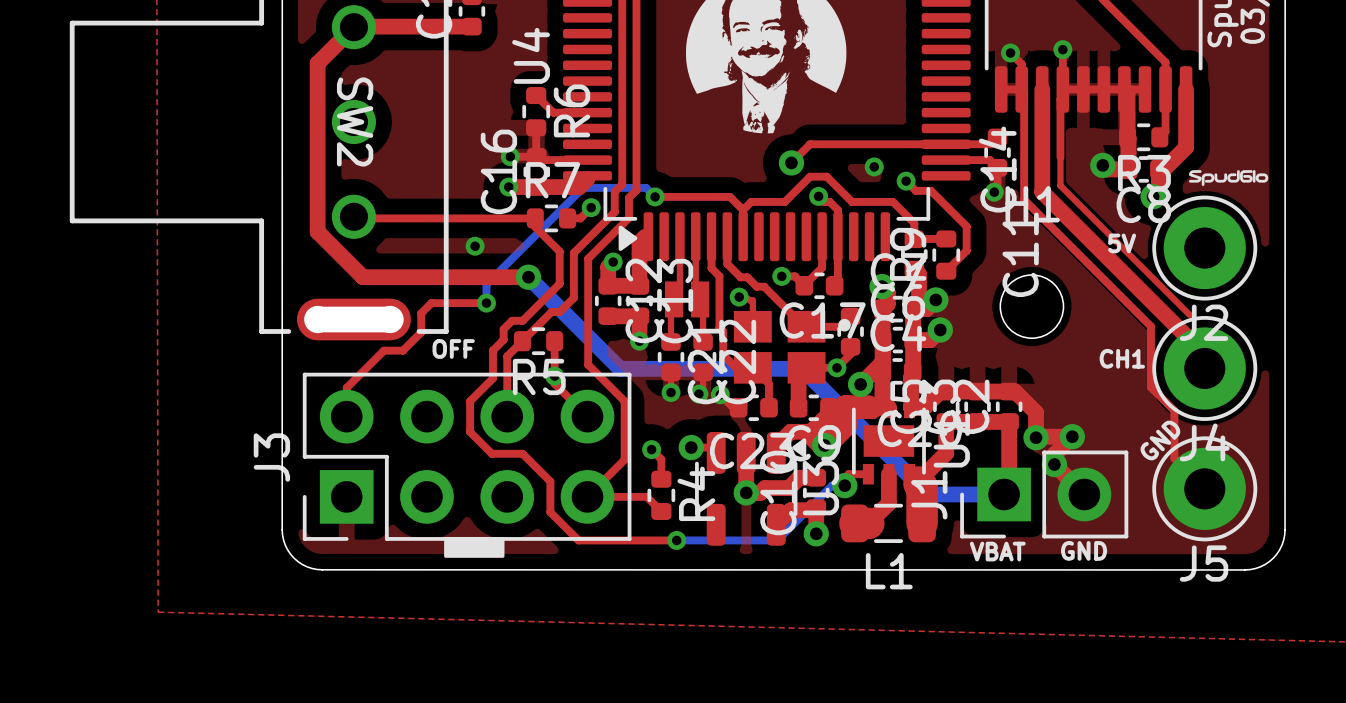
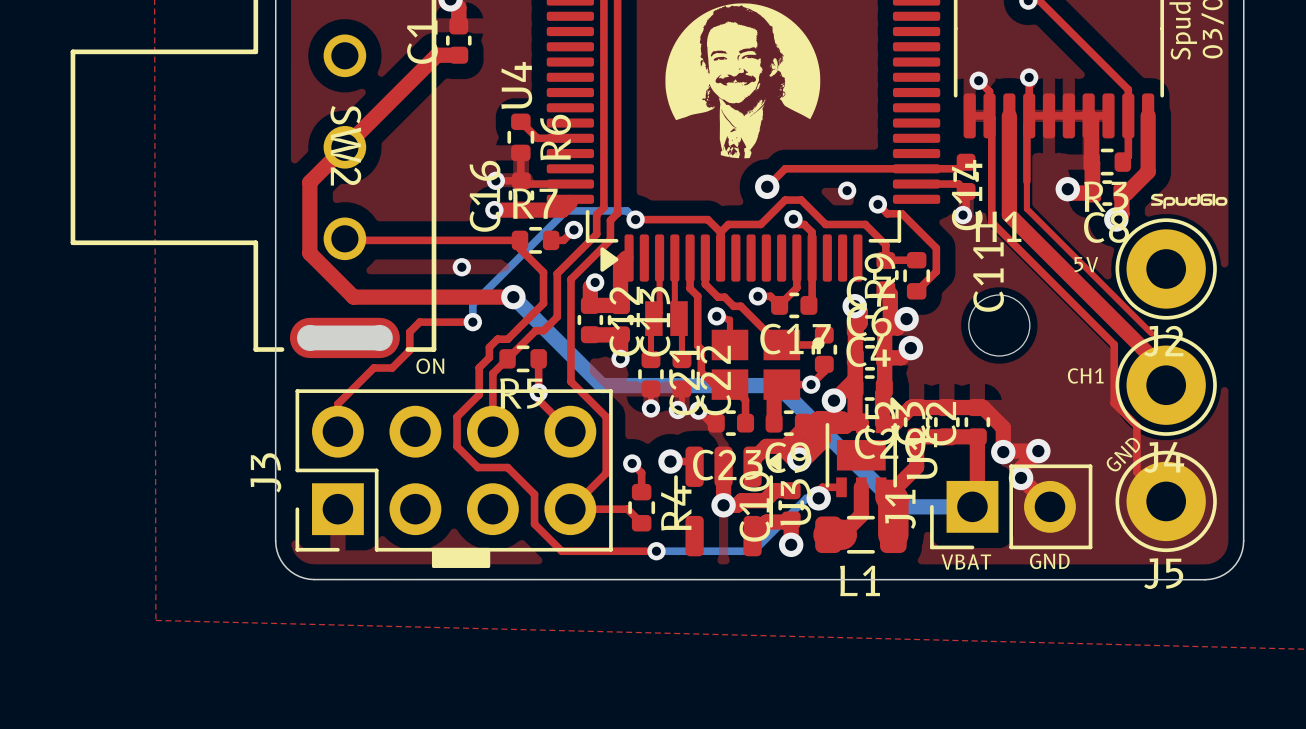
top track: (354, 26) (449, 26) -> none
top track: (353, 27) (317, 63) (317, 158) -> (436, 55) (309, 182)
text: OFF (453, 348) -> ON (430, 366)

